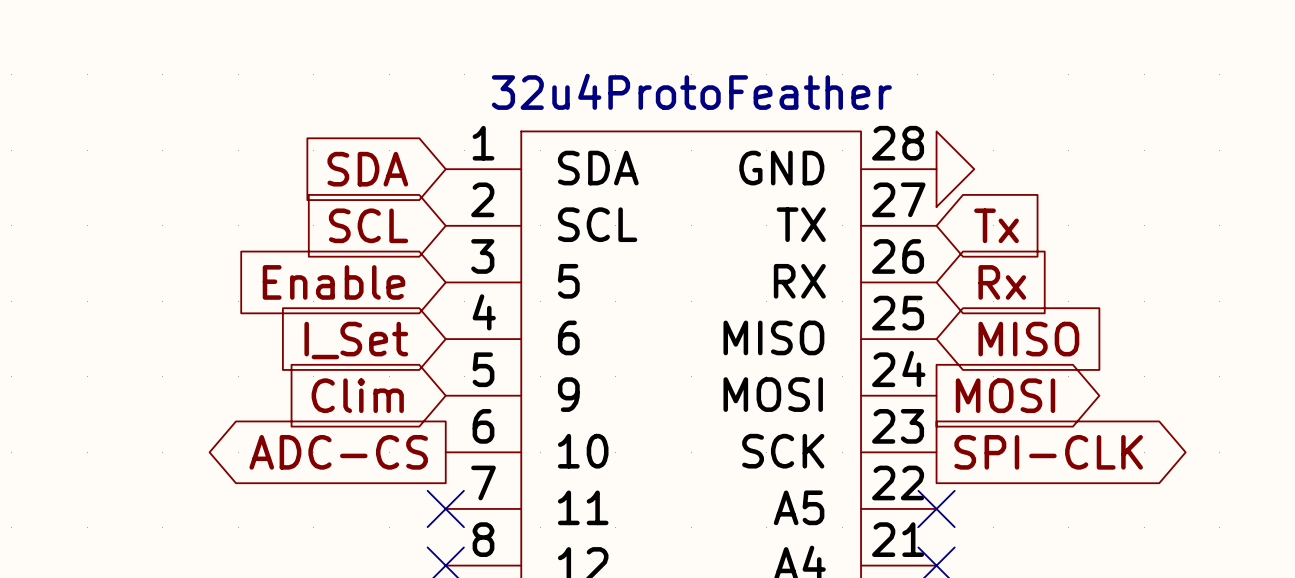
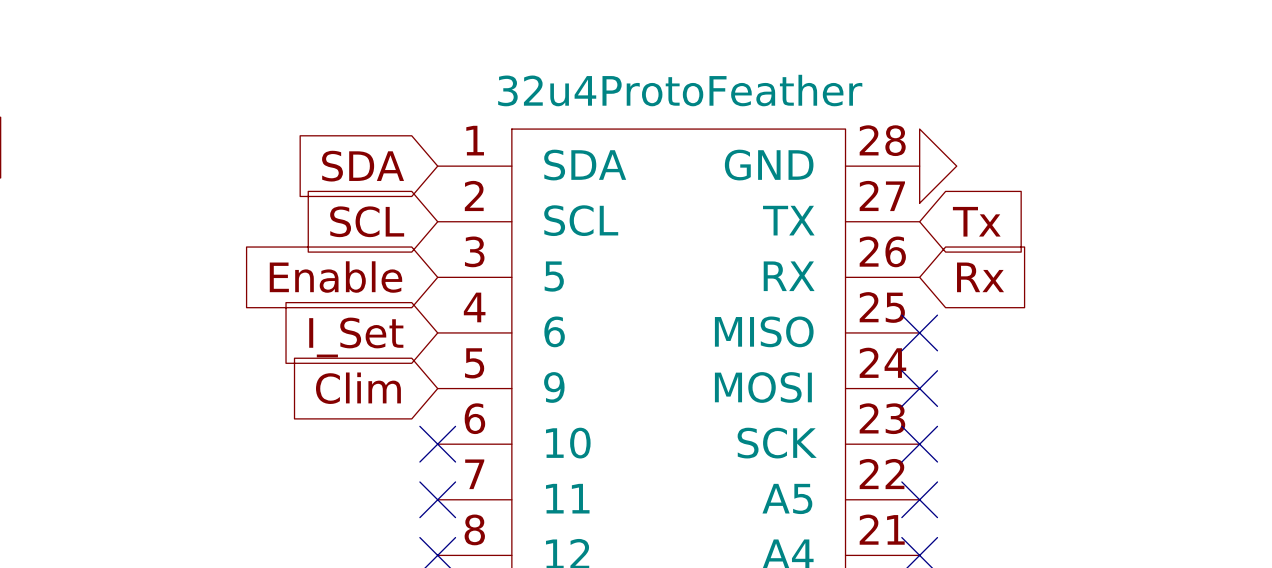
no-connect mark: none -> (919, 332)
global label: MISO (1028, 339) -> none
no-connect mark: none -> (919, 388)
global label: MOSI (1005, 395) -> none
global label: ADC-CS (338, 452) -> none
no-connect mark: none -> (437, 444)
no-connect mark: none -> (919, 444)
global label: SPI-CLK (1048, 452) -> none

